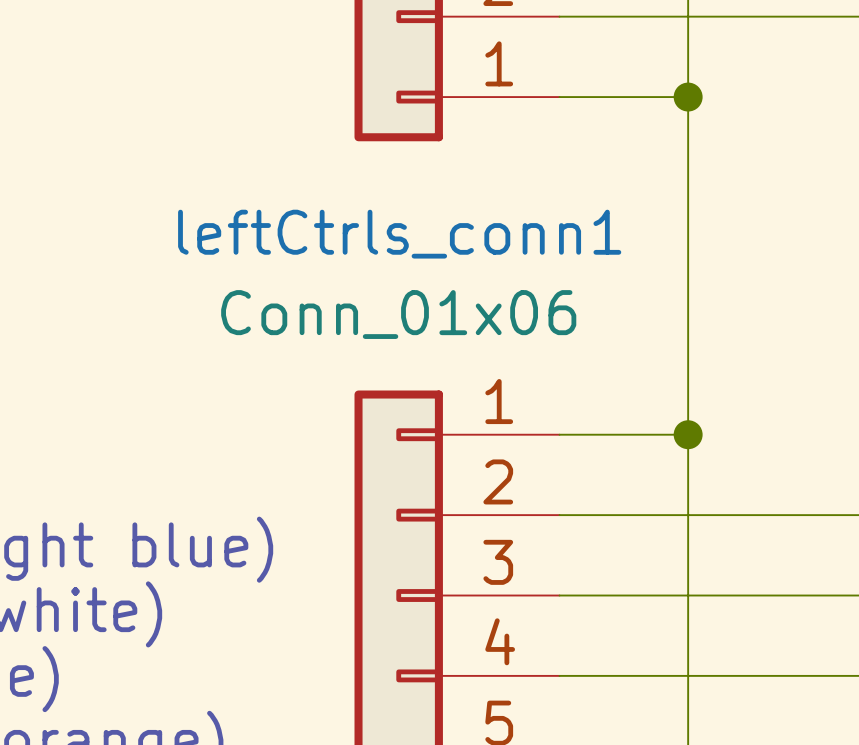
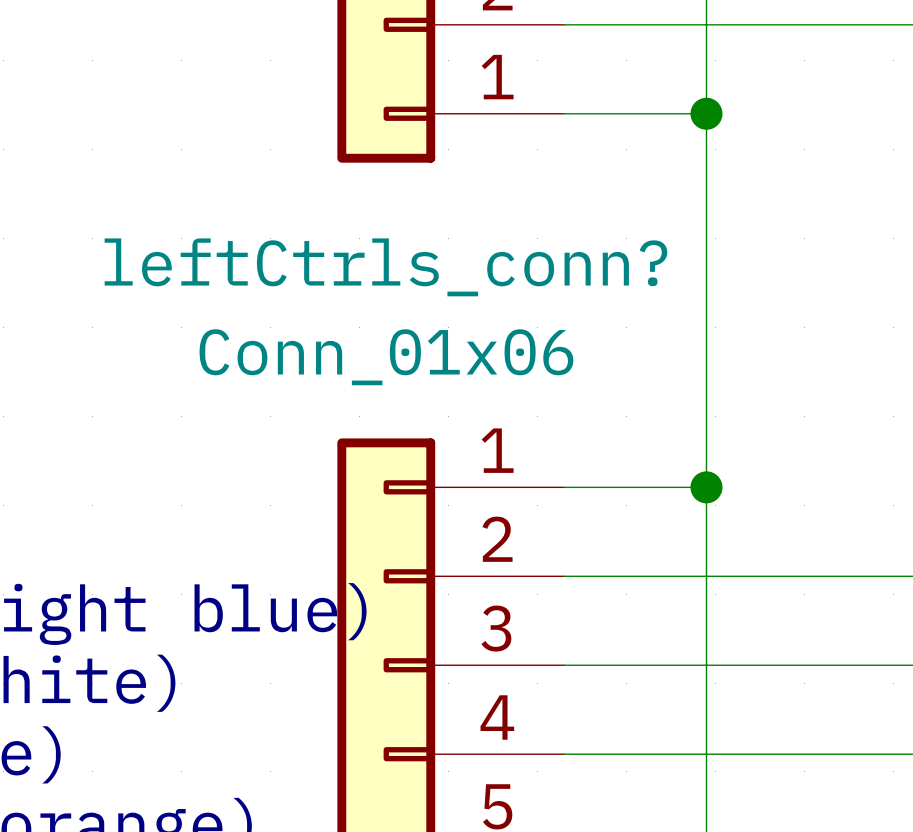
leftCtrls_conn1 name: leftCtrls_conn1 (399, 234) -> leftCtrls_conn? (385, 267)

